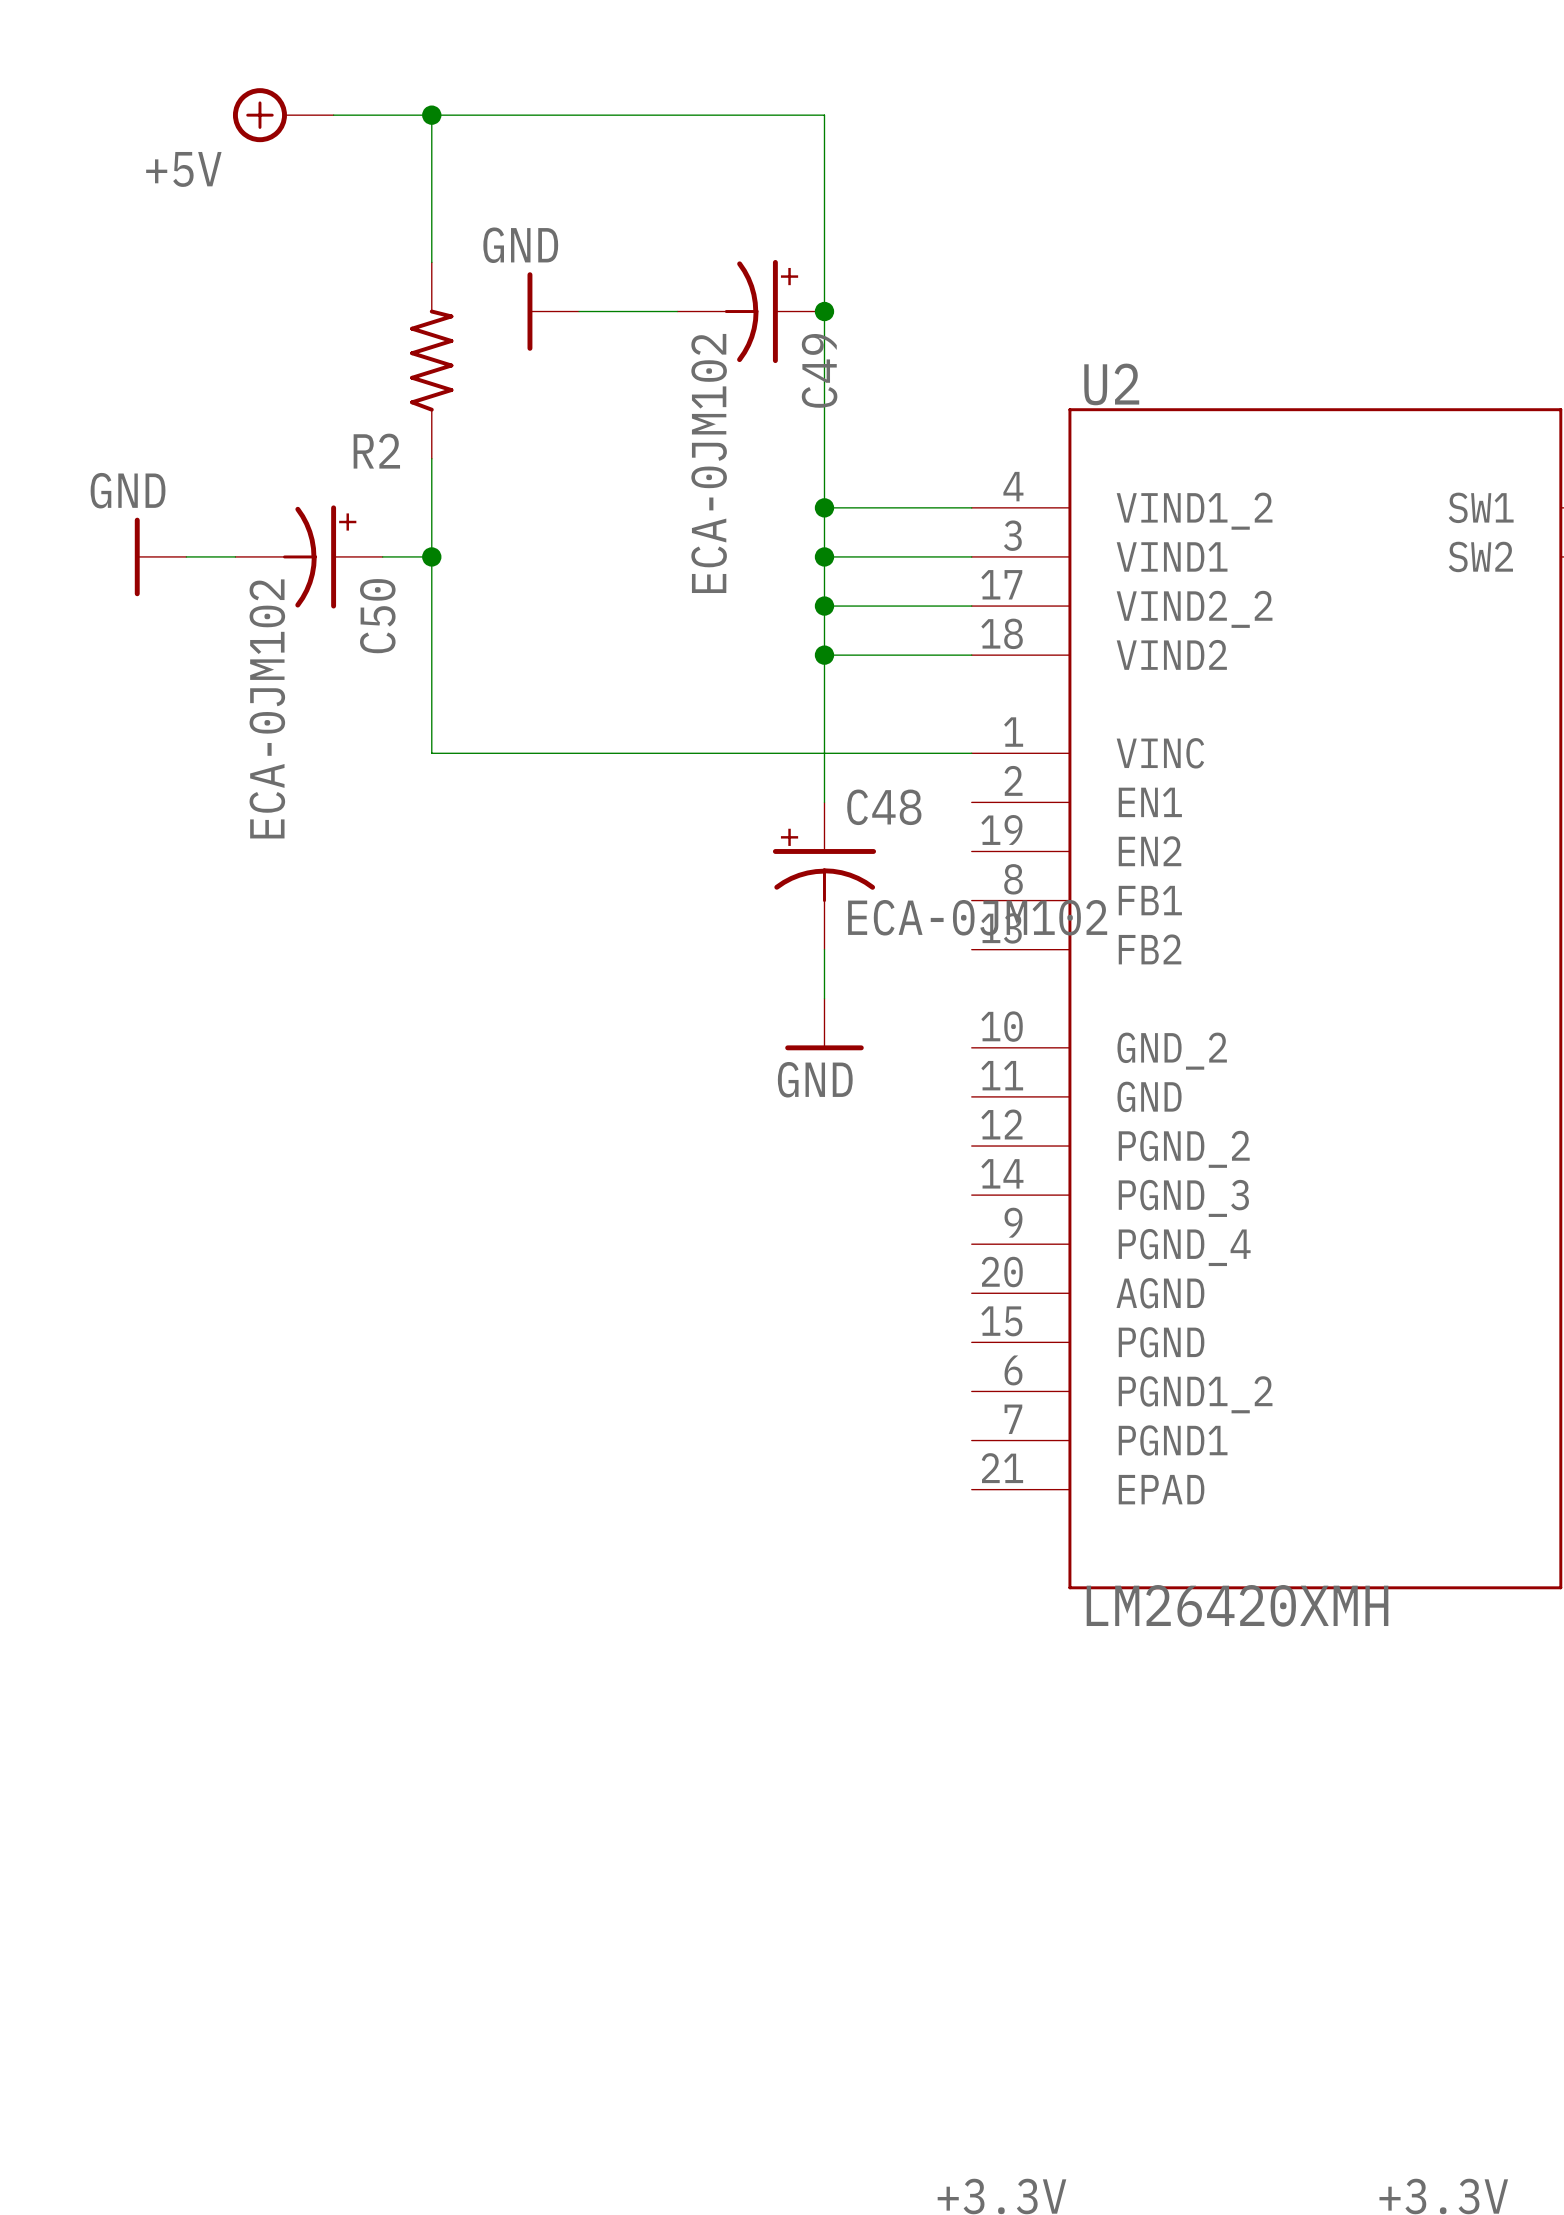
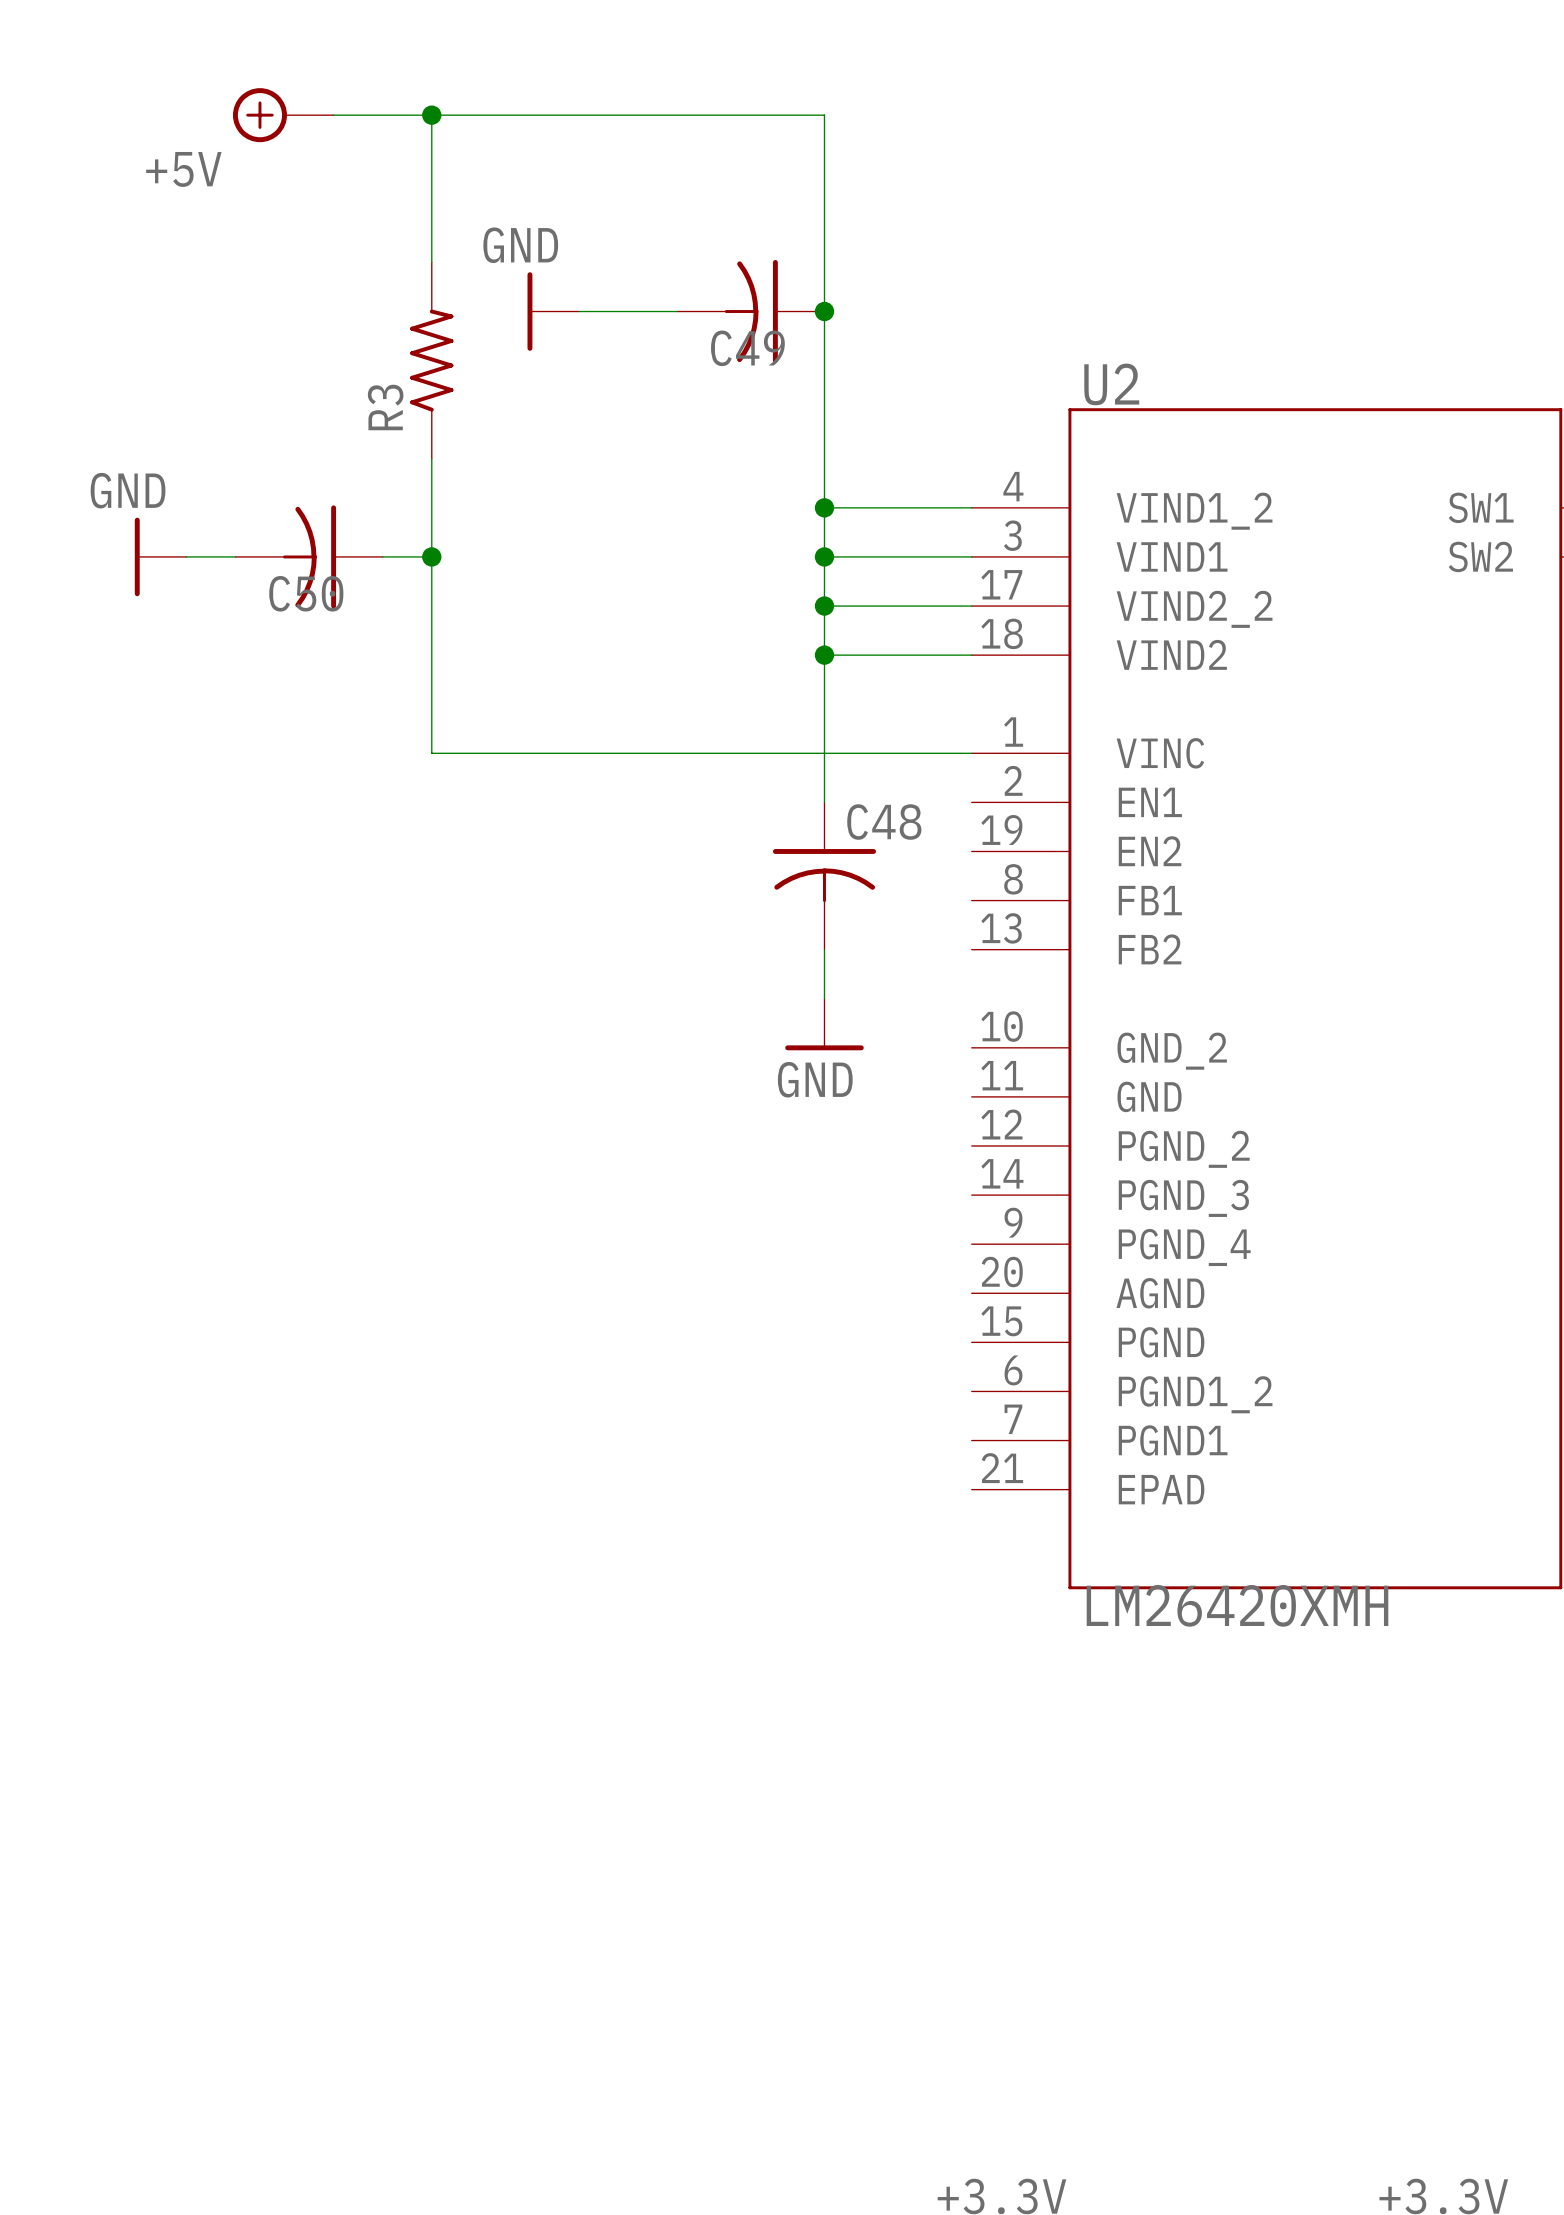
C49 symbol: [677, 259, 825, 364] -> [677, 259, 825, 364]
C49 name position: C49 (819, 370) -> C49 (747, 348)
R2 name: R2 (376, 451) -> R3 (385, 407)
C49 value: ECA-0JM102 (709, 463) -> none
C50 symbol: [235, 505, 383, 609] -> [235, 505, 383, 609]
C50 name position: C50 (377, 616) -> C50 (306, 593)
C50 value: ECA-0JM102 (267, 708) -> none
C48 symbol: [772, 802, 877, 950] -> [772, 802, 877, 950]
C48 value: ECA-0JM102 (977, 917) -> none

